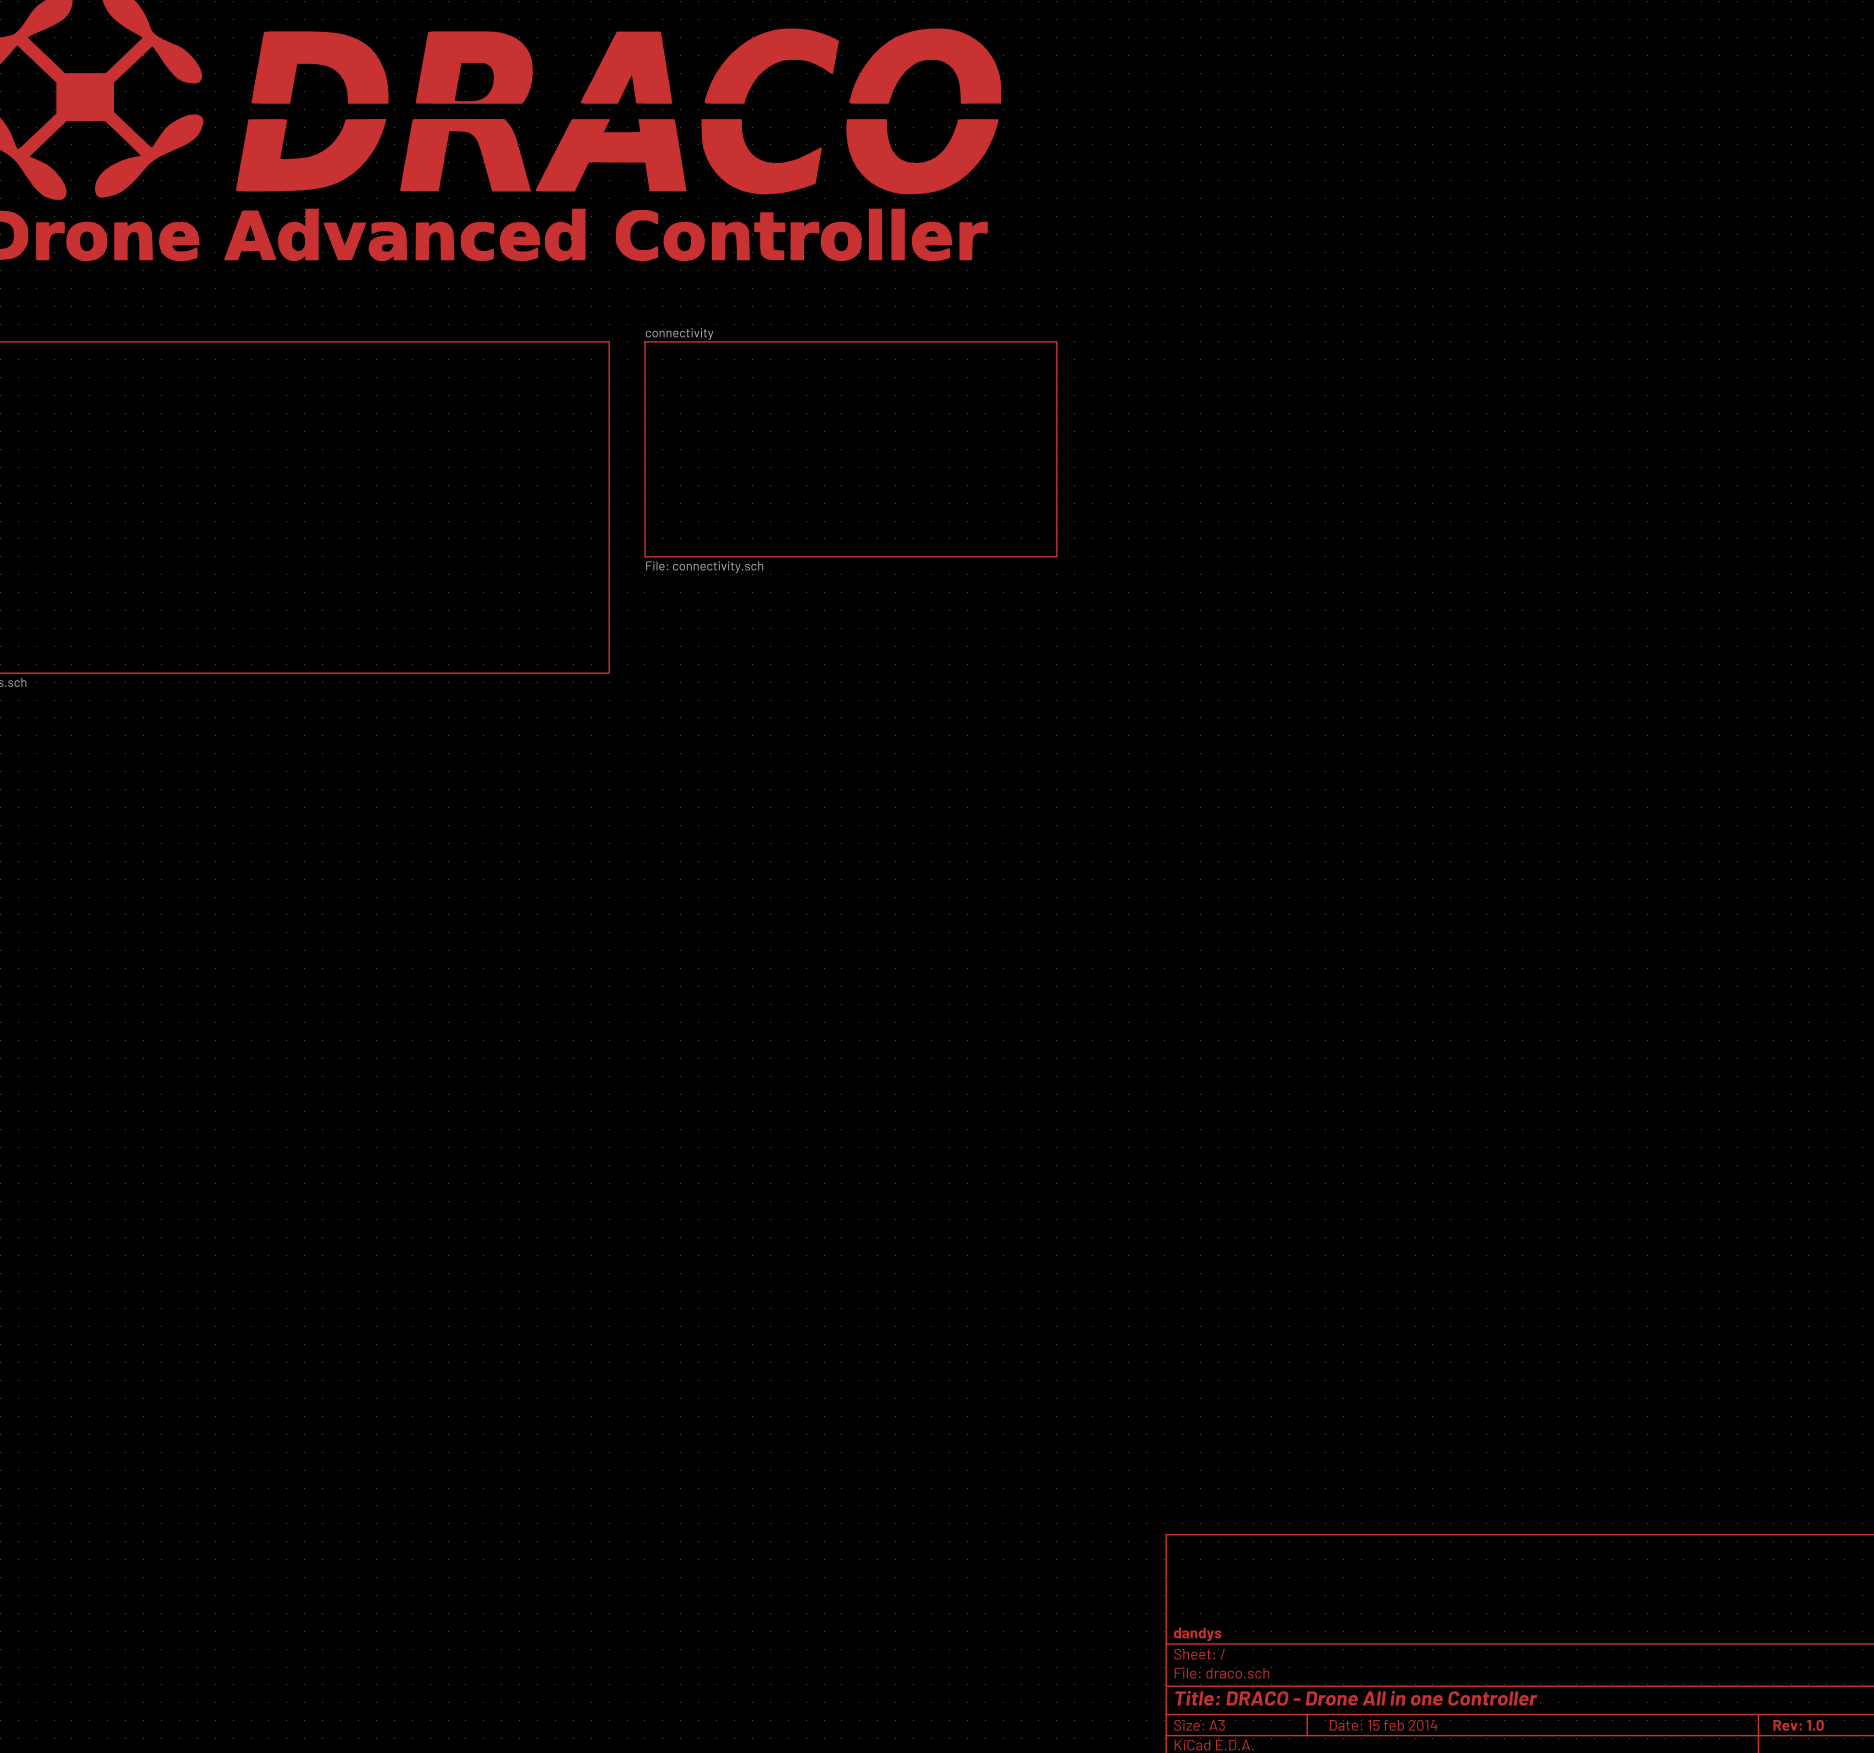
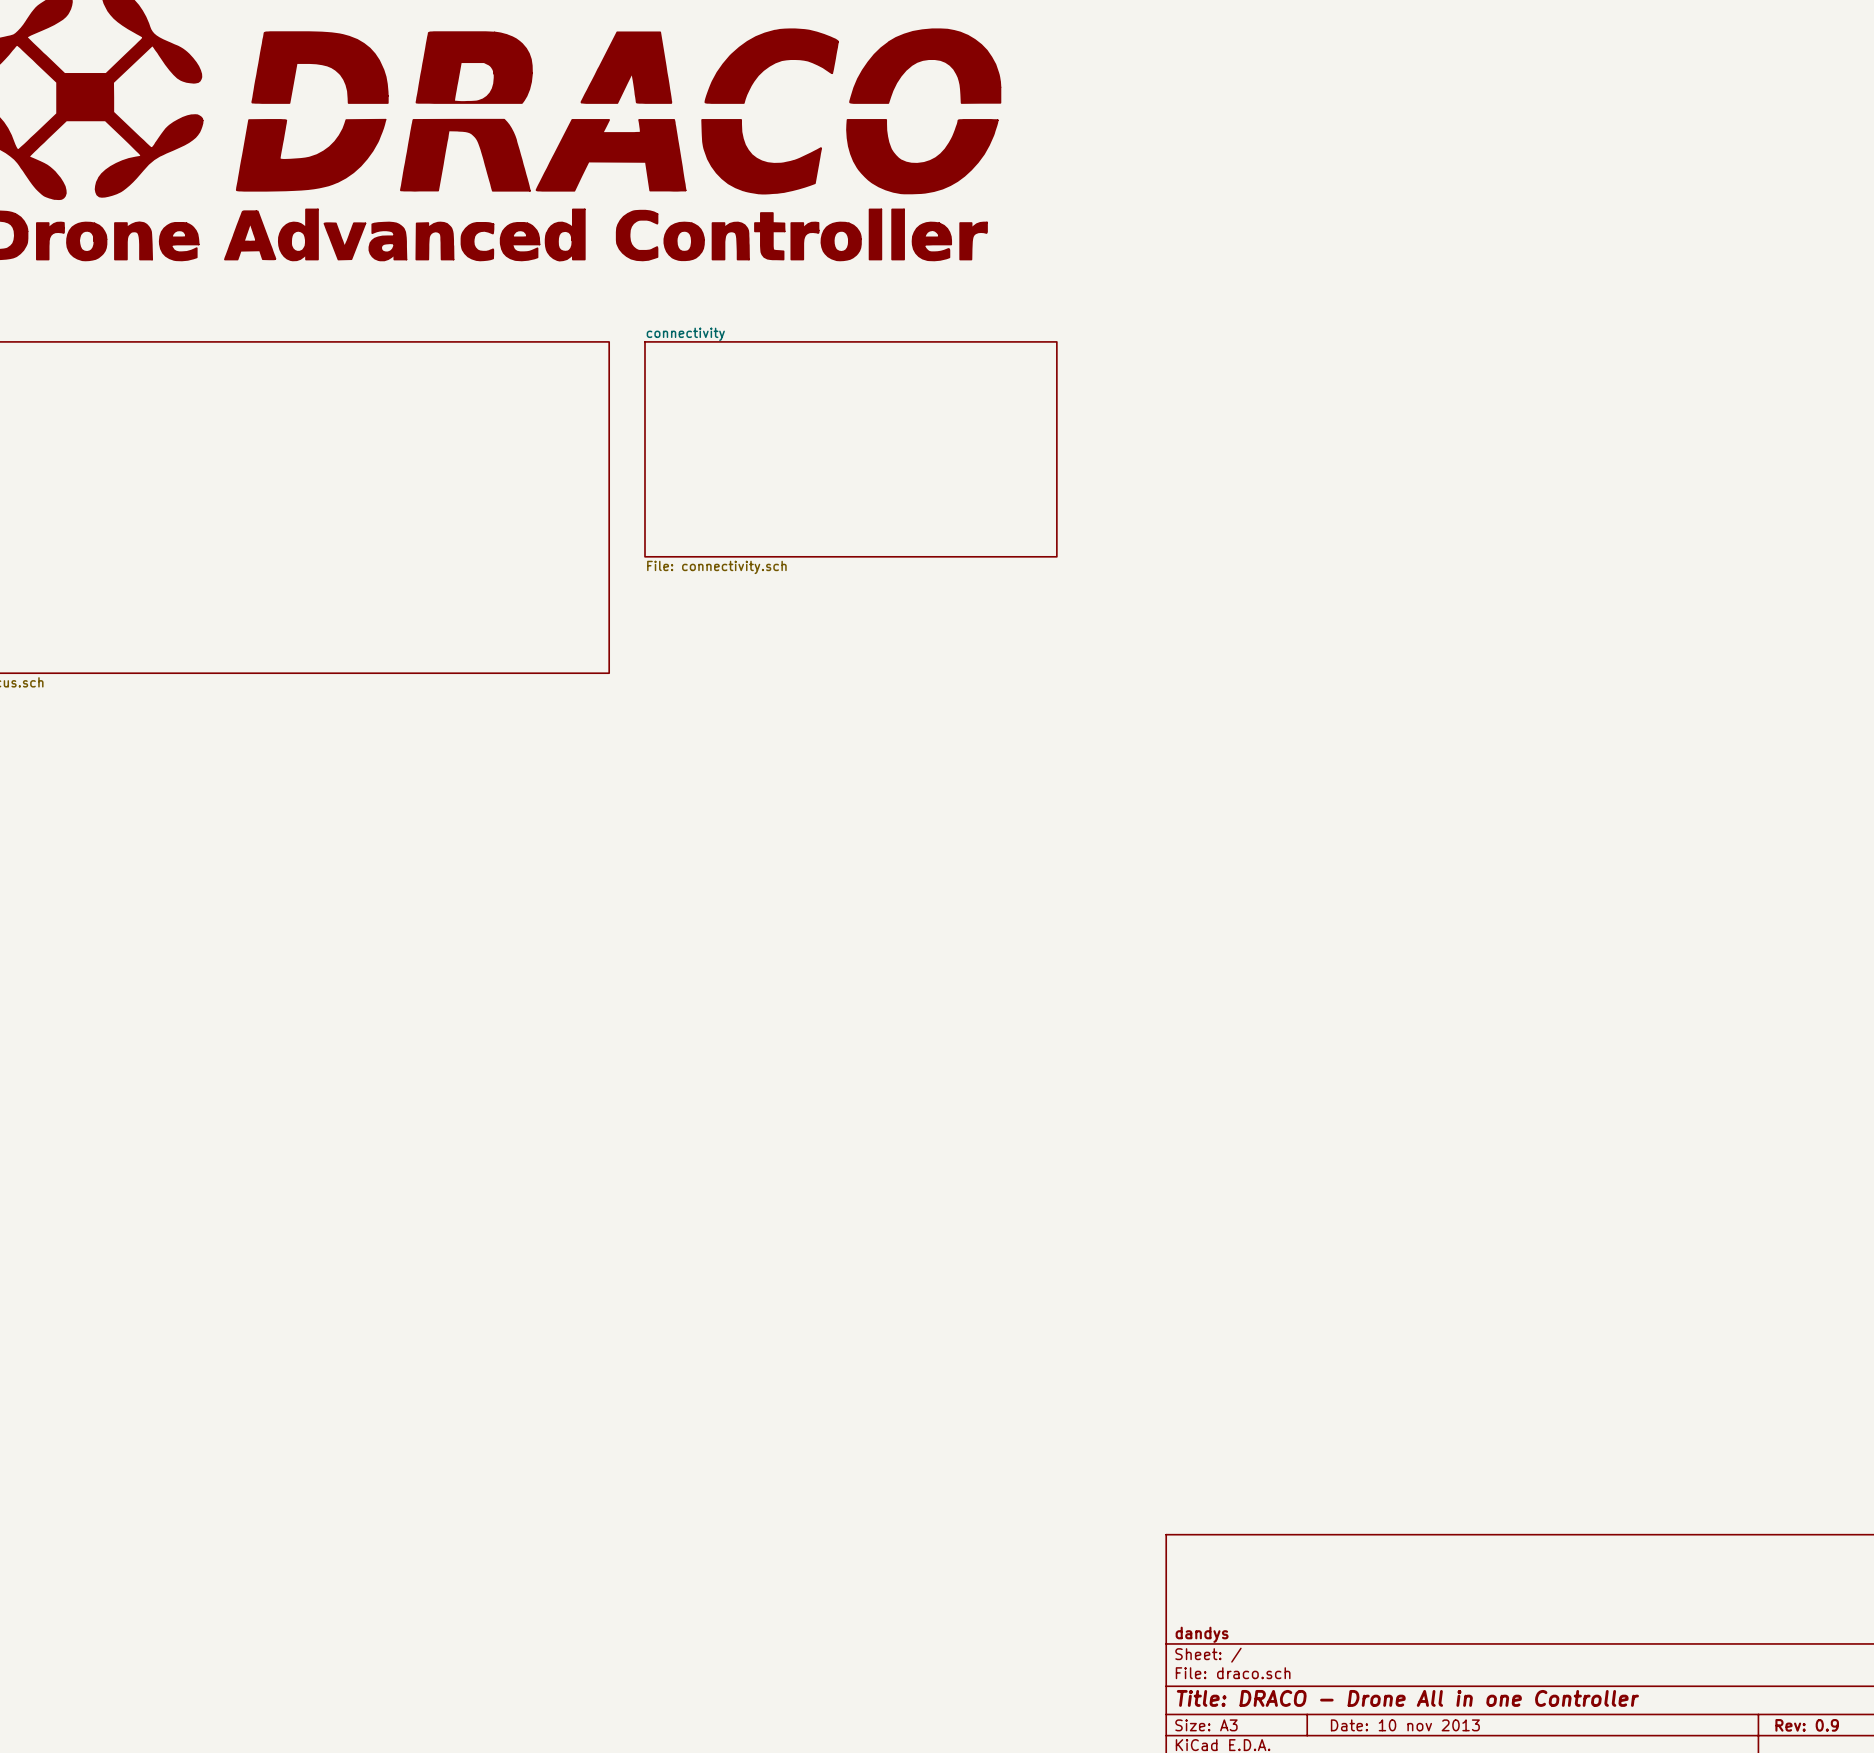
title block: Date: 15 feb 2014 (1383, 1725) -> Date: 10 nov 2013 (1405, 1725)
title block: Rev: 1.0 (1798, 1725) -> Rev: 0.9 (1807, 1725)

